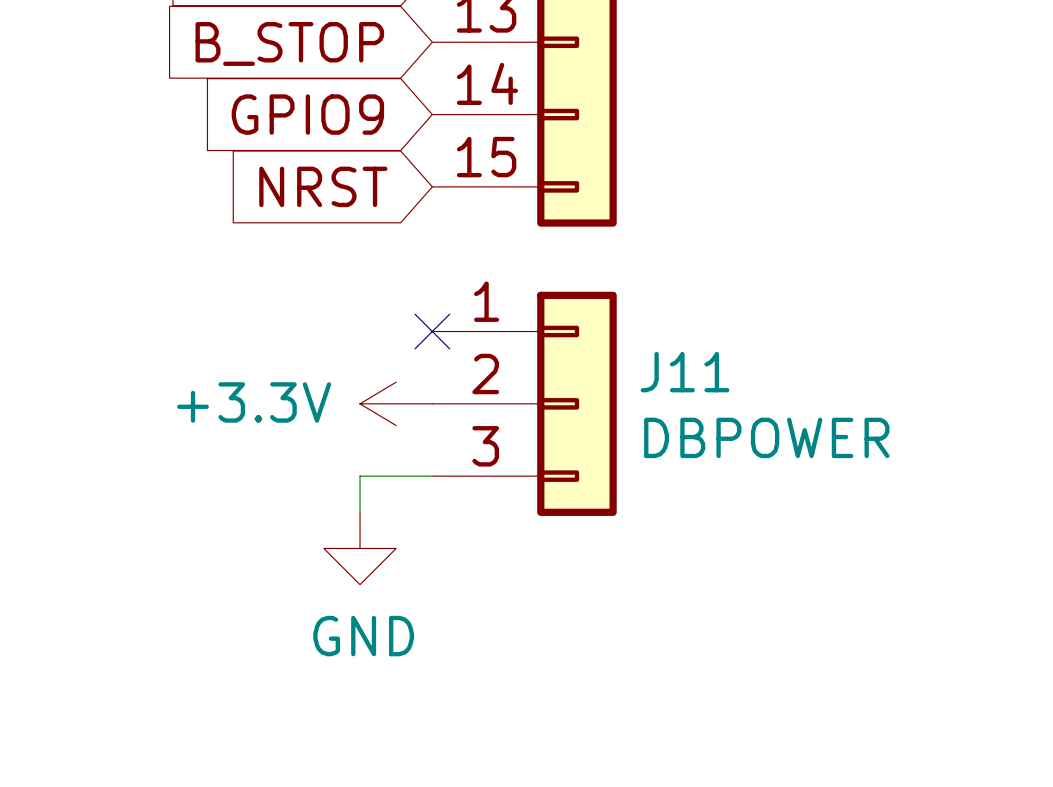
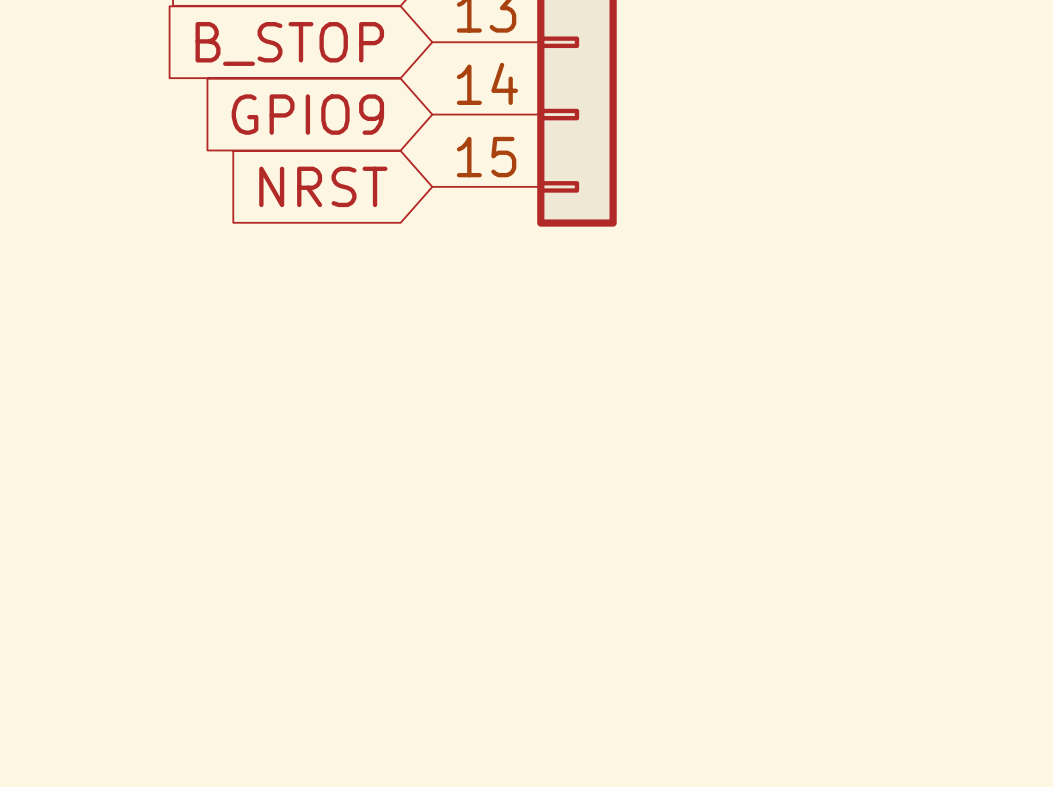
no-connect mark: (432, 331) -> none
power symbol: +3.3V (396, 403) -> none
J11: DBPOWER (524, 403) -> none
wire: (432, 476) (360, 476) (360, 512) -> none
power symbol: GND (360, 548) -> none

